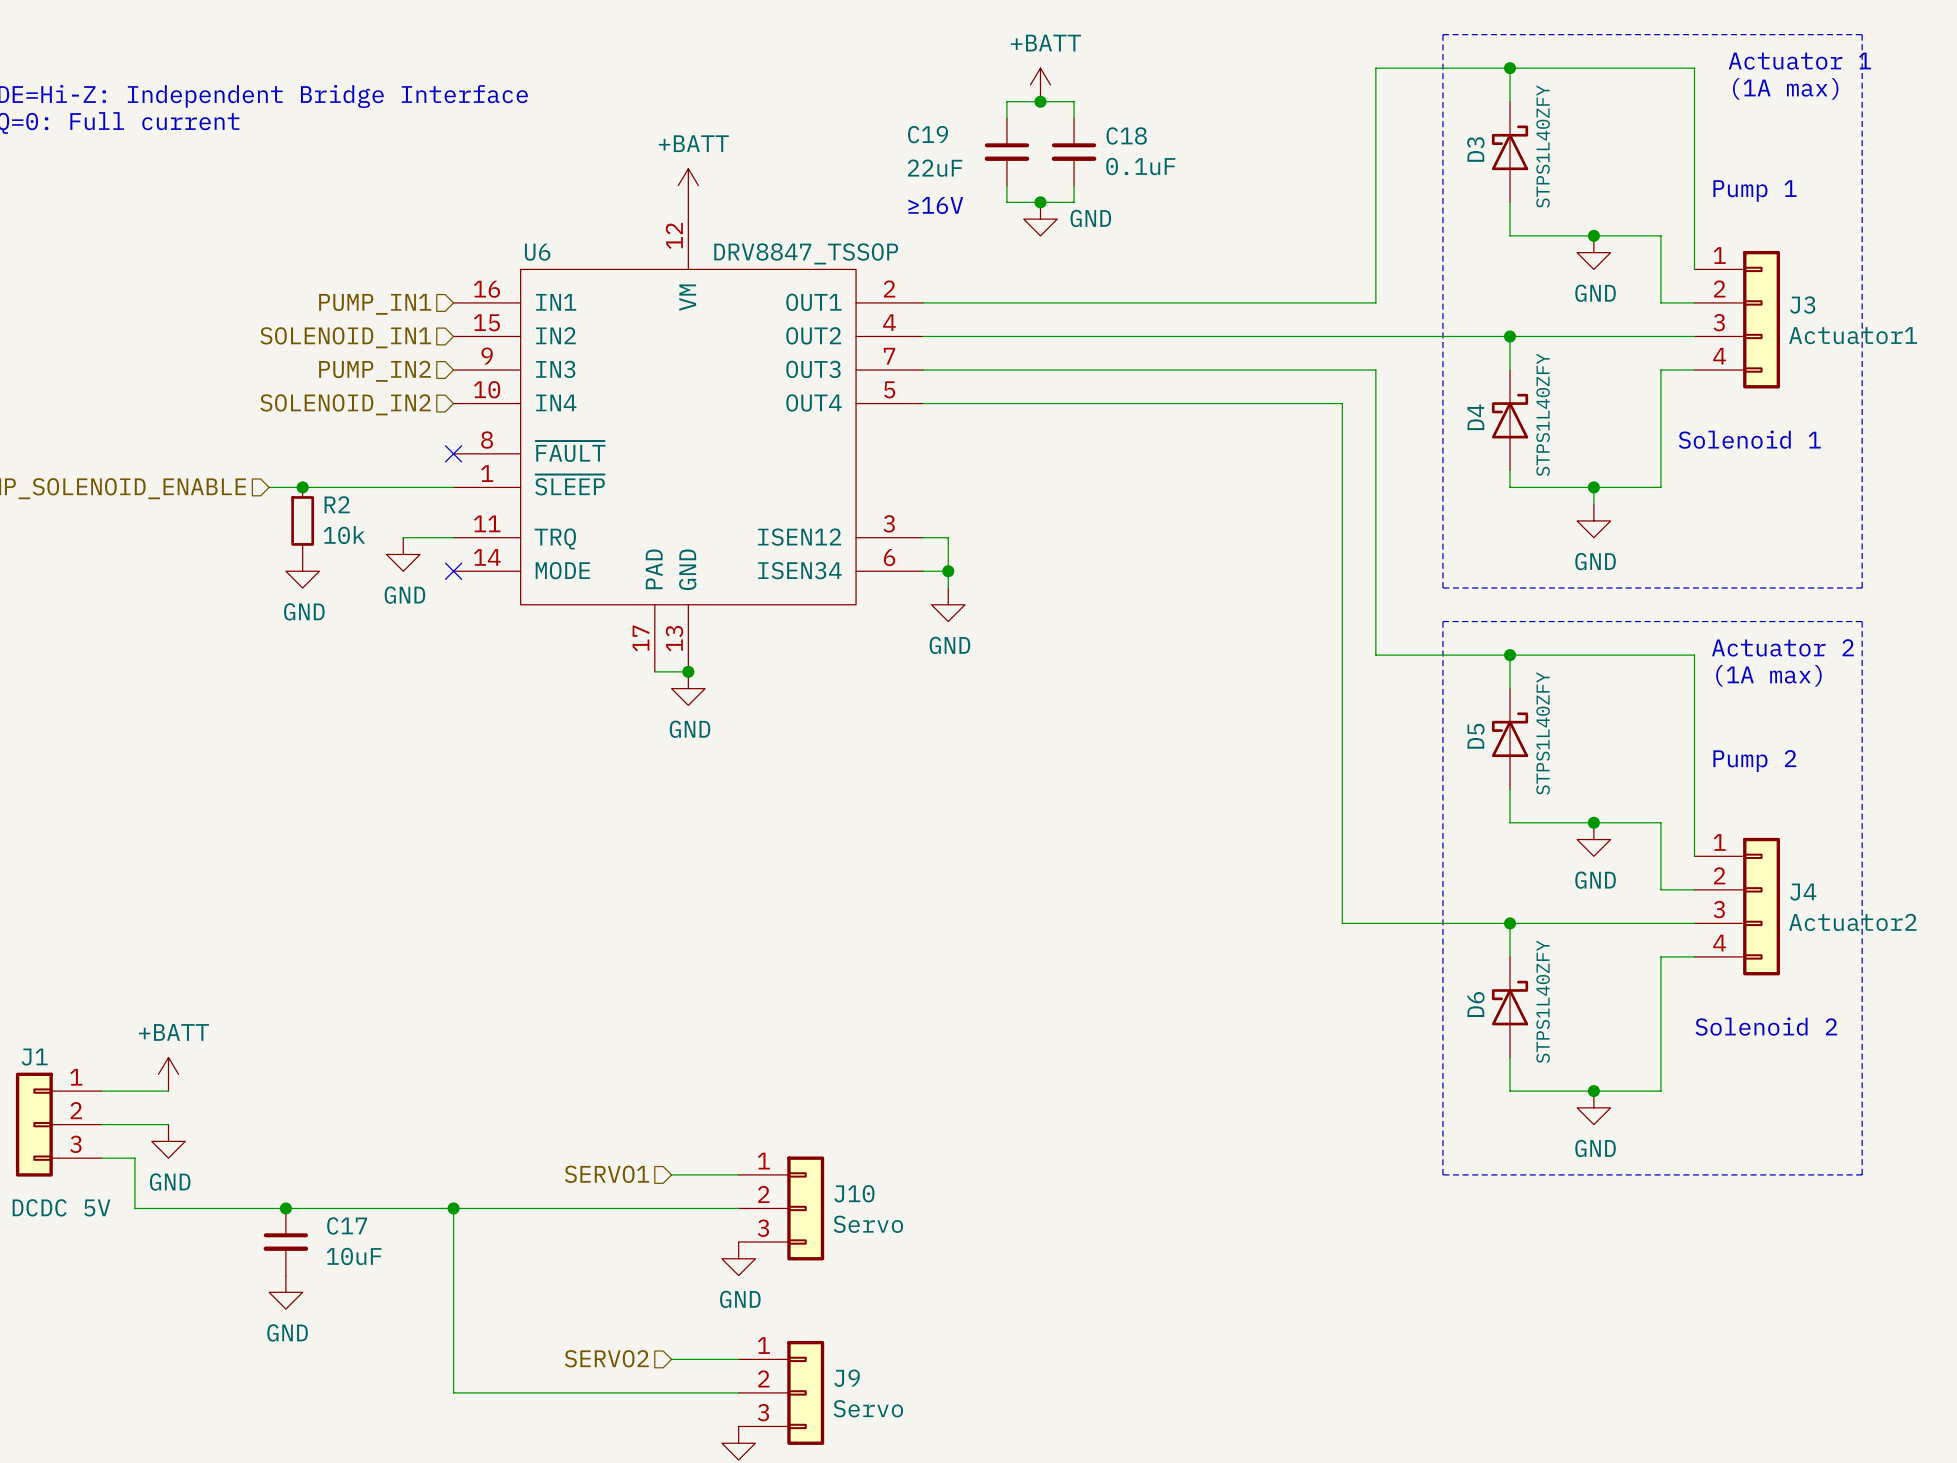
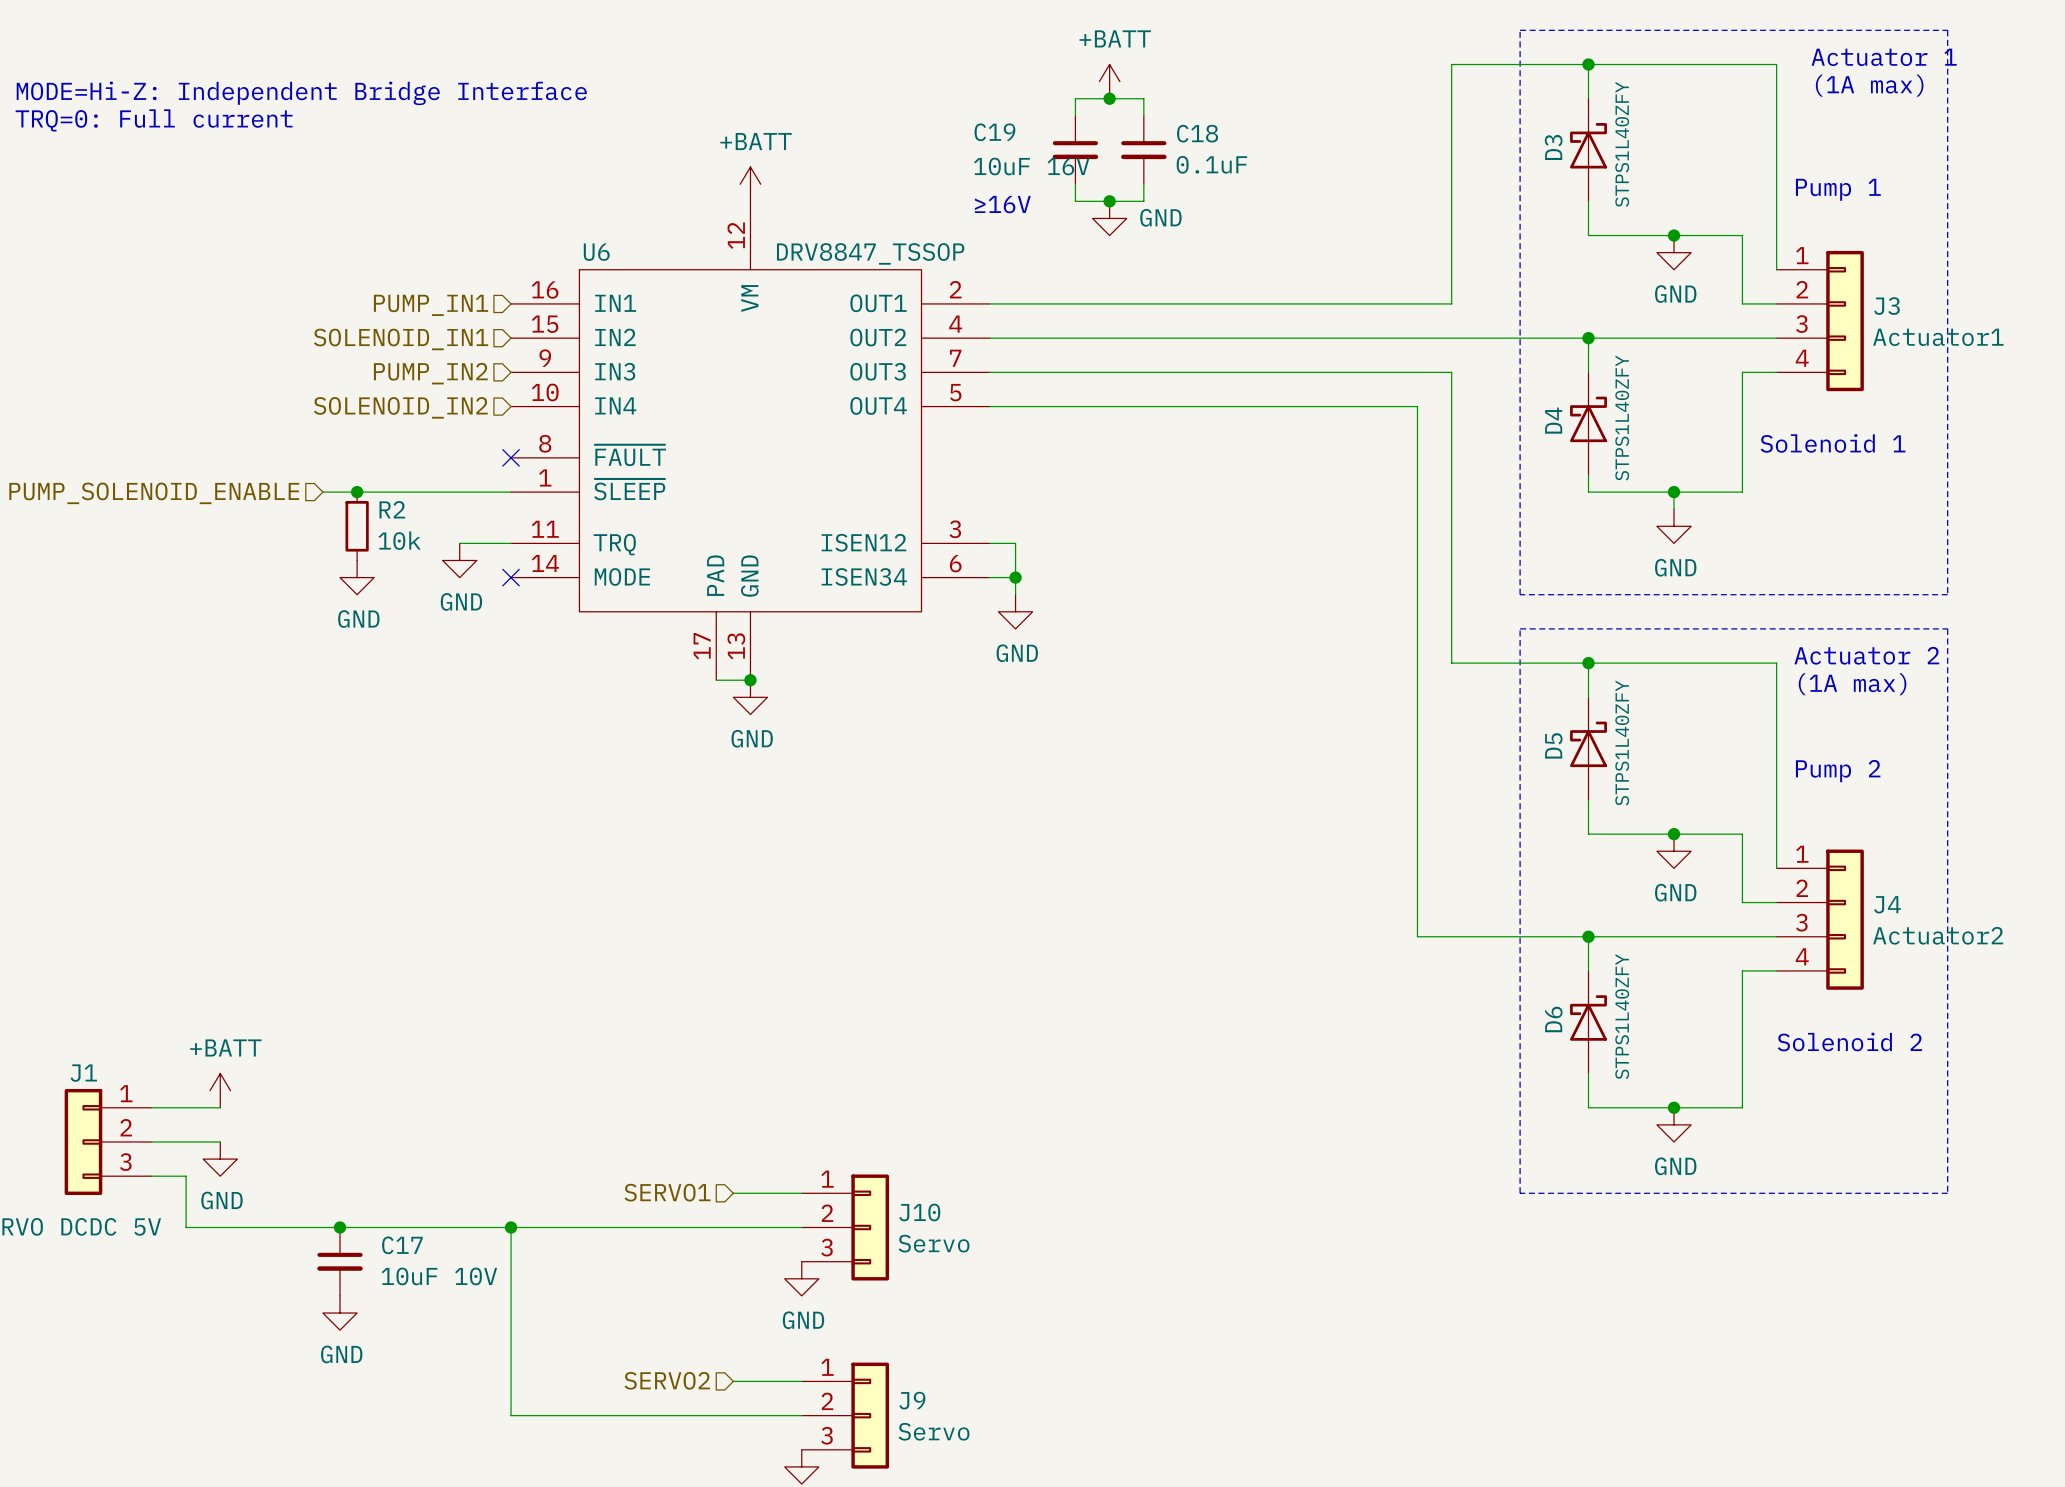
C19 value: 22uF (935, 168) -> 10uF 16V (1031, 166)
C17 value: 10uF (354, 1256) -> 10uF 10V (439, 1276)

